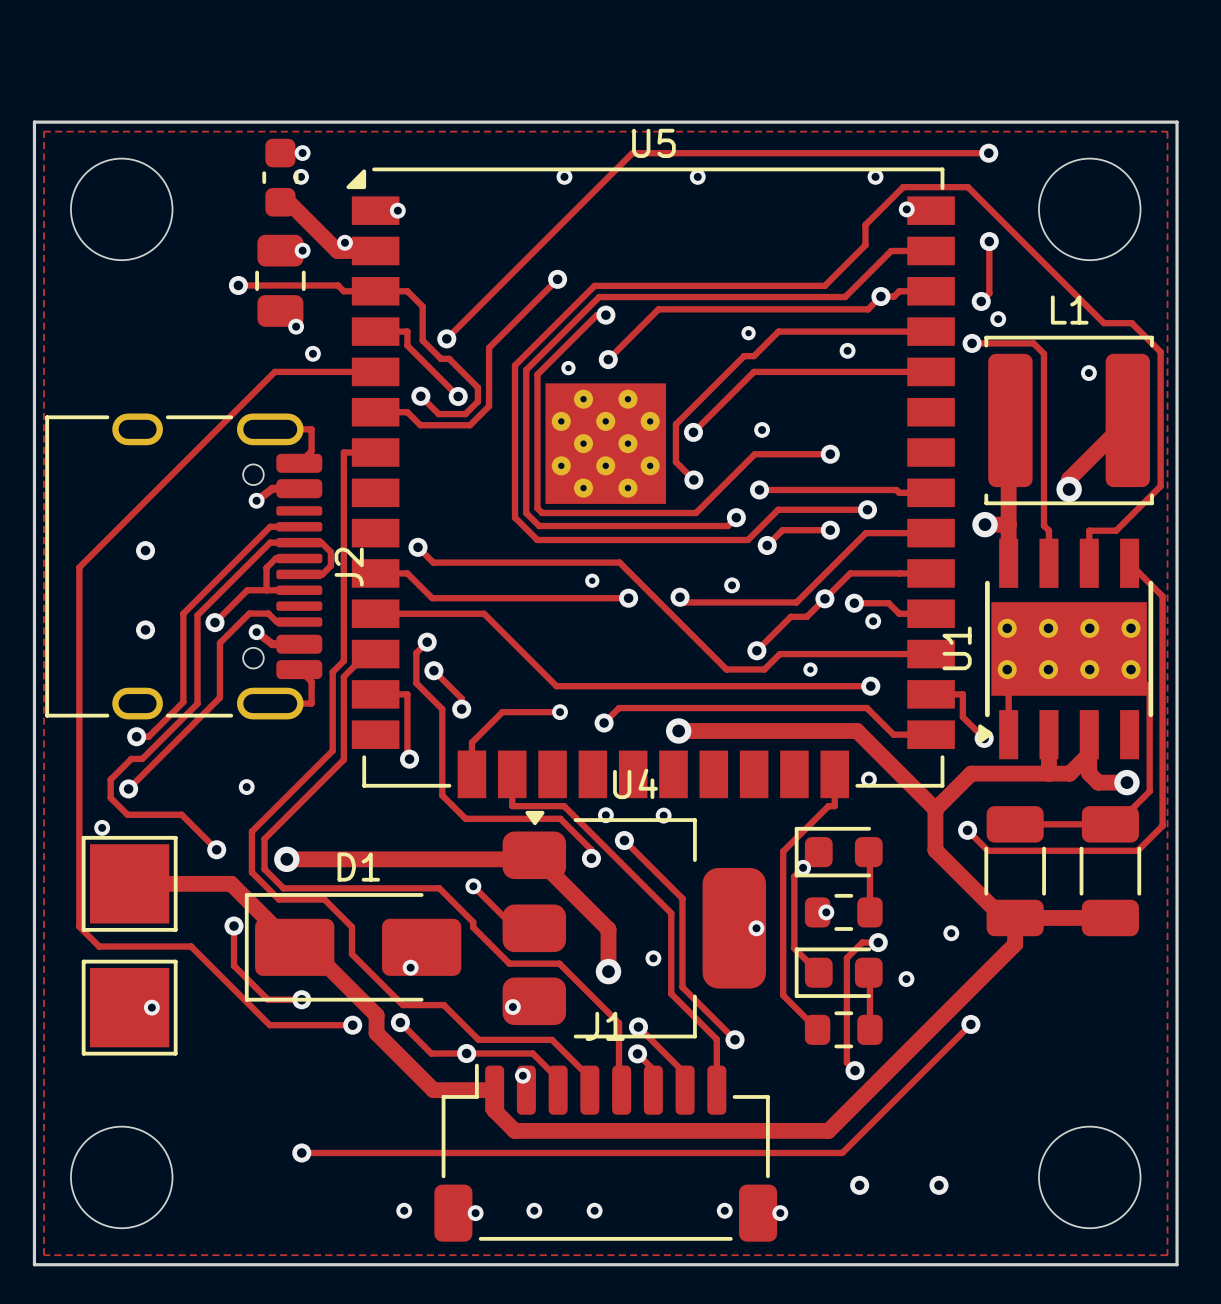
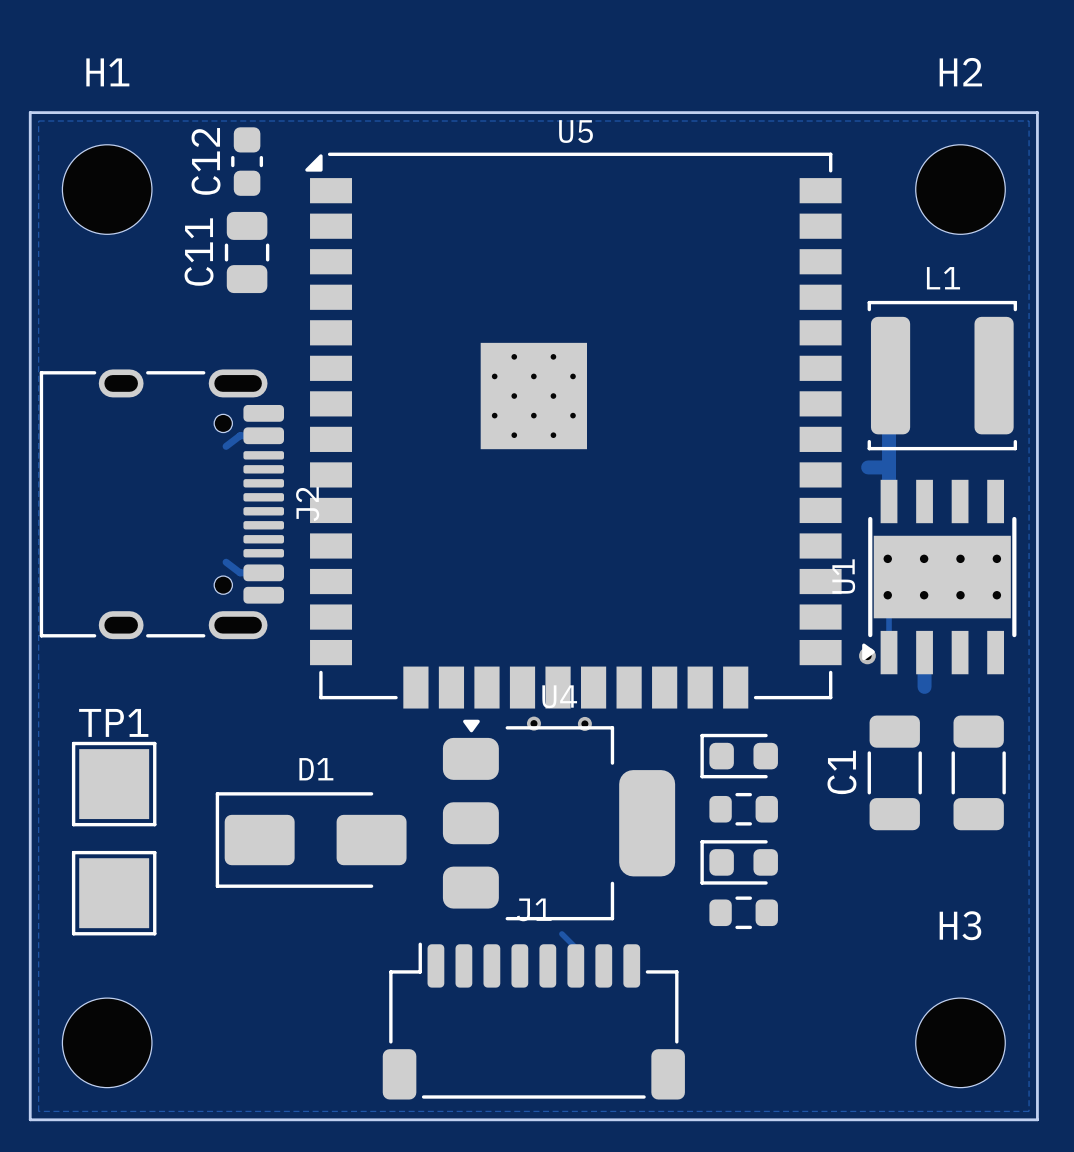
H1 name: none -> H1 (107, 72)
H2 name: none -> H2 (960, 72)
via: (302, 153) -> none
track: (988, 153) (632, 153) (446, 338) -> none
via: (988, 153) -> none
via: (301, 176) -> none
via: (564, 176) -> none
via: (697, 176) -> none
via: (875, 176) -> none
C12 name: none -> C12 (206, 161)
track: (280, 202) (288, 202) (337, 250) (375, 250) (344, 242) -> none
via: (906, 209) -> none
via: (397, 210) -> none
track: (989, 241) (989, 293) (981, 301) -> none
via: (989, 241) -> none
via: (344, 242) -> none
via: (302, 250) -> none
track: (931, 250) (891, 250) (845, 297) (599, 297) (526, 369) (526, 513) (539, 526) (728, 526) (736, 517) -> none
track: (557, 279) (489, 347) (489, 406) (470, 425) (420, 425) (407, 412) (375, 412) -> none
via: (557, 279) -> none
C11 name: none -> C11 (199, 252)
track: (238, 285) (338, 285) (343, 291) (407, 291) (422, 306) (422, 340) (440, 358) (449, 358) (477, 387) (477, 401) (465, 414) (438, 414) (420, 396) -> none
via: (238, 285) -> none
track: (931, 291) (899, 291) (894, 296) (880, 296) (868, 309) (658, 309) (608, 359) -> none
via: (880, 296) -> none
via: (981, 301) -> none
track: (605, 315) (596, 315) (537, 374) (537, 508) (542, 513) (696, 513) (754, 454) (830, 454) -> none
via: (605, 315) -> none
via: (998, 319) -> none
via: (296, 326) -> none
track: (375, 331) (407, 331) (407, 345) (458, 396) -> none
track: (931, 331) (778, 331) (754, 356) (744, 356) (675, 424) (675, 462) (693, 479) -> none
via: (748, 333) -> none
via: (446, 338) -> none
track: (972, 343) (1033, 343) (1043, 353) (1043, 525) (1048, 530) (1048, 563) -> none
via: (972, 343) -> none
via: (847, 350) -> none
via: (312, 353) -> none
via: (608, 359) -> none
via: (568, 368) -> none
track: (375, 371) (274, 371) (79, 567) (79, 926) (99, 946) (191, 946) (269, 1025) (352, 1025) -> none
track: (931, 371) (753, 371) (693, 432) -> none
via: (1088, 373) -> none
via: (420, 396) -> none
via: (458, 396) -> none
track: (1127, 420) (1069, 479) (1069, 489) -> none
track: (270, 429) (311, 429) (311, 451) (299, 463) -> none
via: (762, 429) -> none
via: (693, 432) -> none
track: (375, 452) (343, 452) (343, 660) (332, 672) (332, 750) (251, 831) (251, 872) (278, 899) (324, 899) (351, 926) (351, 954) (402, 1005) (443, 1005) (478, 1039) (552, 1039) (589, 1077) (589, 1090) -> none
via: (830, 454) -> none
via: (693, 479) -> none
track: (759, 489) (896, 489) (899, 492) (931, 492) -> none
via: (759, 489) -> none
via: (1069, 489) -> none
via: (256, 500) -> none
track: (867, 509) (778, 509) (747, 539) (537, 539) (515, 517) (515, 365) (594, 285) (824, 285) (865, 245) (865, 224) (903, 187) (967, 187) (1103, 323) (1131, 323) (1160, 351) (1160, 486) (1116, 530) (1089, 530) (1089, 563) -> none
via: (867, 509) -> none
via: (736, 517) -> none
via: (984, 524) -> none
track: (299, 526) (270, 526) (183, 613) (183, 702) (148, 736) (136, 736) -> none
track: (830, 530) (782, 530) (767, 545) -> none
via: (830, 530) -> none
track: (931, 533) (865, 533) (796, 602) (685, 602) (680, 597) -> none
via: (767, 545) -> none
track: (418, 547) (433, 562) (619, 562) (726, 669) (764, 669) (779, 654) (931, 654) -> none
via: (418, 547) -> none
via: (145, 550) -> none
track: (299, 558) (275, 558) (266, 567) (266, 590) -> none
track: (1129, 563) (1162, 596) (1162, 825) (1137, 850) (988, 850) (967, 830) -> none
track: (375, 573) (407, 573) (432, 598) (628, 598) -> none
track: (931, 573) (850, 573) (806, 616) (790, 616) (756, 650) -> none
track: (299, 574) (322, 574) (330, 565) (330, 552) (321, 542) (270, 542) (197, 615) (197, 703) (142, 758) (131, 758) (110, 779) (110, 797) (127, 814) (181, 814) (216, 849) -> none
via: (592, 580) -> none
via: (732, 585) -> none
track: (299, 590) (247, 590) (215, 622) -> none
via: (680, 597) -> none
via: (628, 598) -> none
via: (824, 598) -> none
track: (854, 603) (888, 603) (899, 613) (931, 613) -> none
via: (854, 603) -> none
track: (375, 613) (484, 613) (556, 686) (870, 686) -> none
via: (873, 621) -> none
via: (215, 622) -> none
track: (299, 622) (276, 622) (268, 613) (249, 613) (219, 642) (219, 697) (128, 788) -> none
via: (145, 629) -> none
via: (256, 632) -> none
track: (427, 642) (416, 652) (416, 683) (442, 709) (442, 795) (465, 818) (560, 818) (591, 849) (591, 858) -> none
via: (427, 642) -> none
via: (756, 650) -> none
track: (375, 654) (366, 654) (343, 676) (343, 759) (264, 838) (264, 869) (283, 888) (439, 888) (473, 922) (473, 927) (509, 963) (559, 963) (619, 1023) (619, 1087) (621, 1090) -> none
track: (299, 669) (311, 681) (311, 703) (270, 703) -> none
via: (810, 669) -> none
track: (1131, 669) (1149, 688) (1149, 791) (1116, 824) (1015, 824) -> none
track: (433, 670) (461, 698) (461, 709) -> none
via: (433, 670) -> none
via: (870, 686) -> none
track: (375, 694) (407, 694) (407, 757) (409, 759) -> none
track: (931, 694) (962, 694) (962, 717) (984, 738) -> none
via: (461, 709) -> none
track: (560, 712) (502, 712) (471, 742) (471, 774) -> none
via: (560, 712) -> none
track: (604, 722) (619, 708) (866, 708) (893, 734) (931, 734) -> none
via: (604, 722) -> none
track: (678, 730) (857, 730) (935, 809) -> none
via: (678, 730) -> none
track: (1089, 734) (1089, 773) (1098, 782) (1126, 782) -> none
via: (136, 736) -> none
track: (1089, 754) (1069, 773) (971, 773) (935, 809) -> none
via: (409, 759) -> none
track: (512, 774) (512, 806) (564, 806) (671, 913) (671, 993) (716, 1039) (716, 1090) -> none
track: (834, 774) (834, 806) (828, 806) (783, 851) (783, 995) (817, 1029) -> none
via: (868, 779) -> none
via: (1126, 782) -> none
via: (246, 787) -> none
via: (128, 788) -> none
track: (935, 809) (935, 850) (1003, 917) (1110, 917) -> none
TP1 name: none -> TP1 (113, 722)
via: (102, 827) -> none
via: (967, 830) -> none
track: (624, 840) (682, 898) (682, 987) (735, 1039) -> none
via: (624, 840) -> none
via: (216, 849) -> none
track: (868, 852) (869, 912) -> none
via: (591, 858) -> none
track: (286, 859) (530, 859) (534, 855) (608, 929) (608, 971) -> none
via: (286, 859) -> none
track: (803, 867) (818, 852) (794, 876) (794, 948) (818, 972) -> none
via: (803, 867) -> none
C1 name: none -> C1 (841, 772)
track: (129, 883) (231, 883) (294, 947) (308, 947) (376, 1015) (376, 1033) (433, 1090) (494, 1090) (494, 1110) (514, 1130) (828, 1130) (1015, 944) (1015, 917) -> none
track: (473, 886) (515, 928) (534, 928) -> none
via: (473, 886) -> none
via: (826, 912) -> none
track: (234, 926) (234, 965) (267, 999) (301, 999) -> none
via: (234, 926) -> none
via: (756, 928) -> none
via: (951, 933) -> none
track: (878, 942) (862, 942) (846, 958) (846, 1062) (855, 1070) -> none
via: (878, 942) -> none
via: (653, 958) -> none
via: (410, 967) -> none
via: (608, 971) -> none
track: (868, 972) (869, 1029) -> none
via: (906, 979) -> none
via: (301, 999) -> none
via: (151, 1007) -> none
via: (512, 1007) -> none
track: (400, 1022) (431, 1053) (532, 1053) (558, 1078) (558, 1090) -> none
via: (400, 1022) -> none
track: (970, 1024) (842, 1152) (301, 1152) -> none
via: (970, 1024) -> none
via: (352, 1025) -> none
track: (638, 1027) (685, 1073) (685, 1090) -> none
via: (638, 1027) -> none
via: (735, 1039) -> none
H3 name: none -> H3 (960, 925)
via: (466, 1053) -> none
via: (637, 1053) -> none
via: (855, 1070) -> none
via: (522, 1075) -> none
via: (301, 1152) -> none
via: (859, 1185) -> none
via: (939, 1185) -> none
via: (404, 1210) -> none
via: (534, 1210) -> none
via: (594, 1210) -> none
via: (724, 1210) -> none
via: (475, 1213) -> none
via: (780, 1213) -> none

